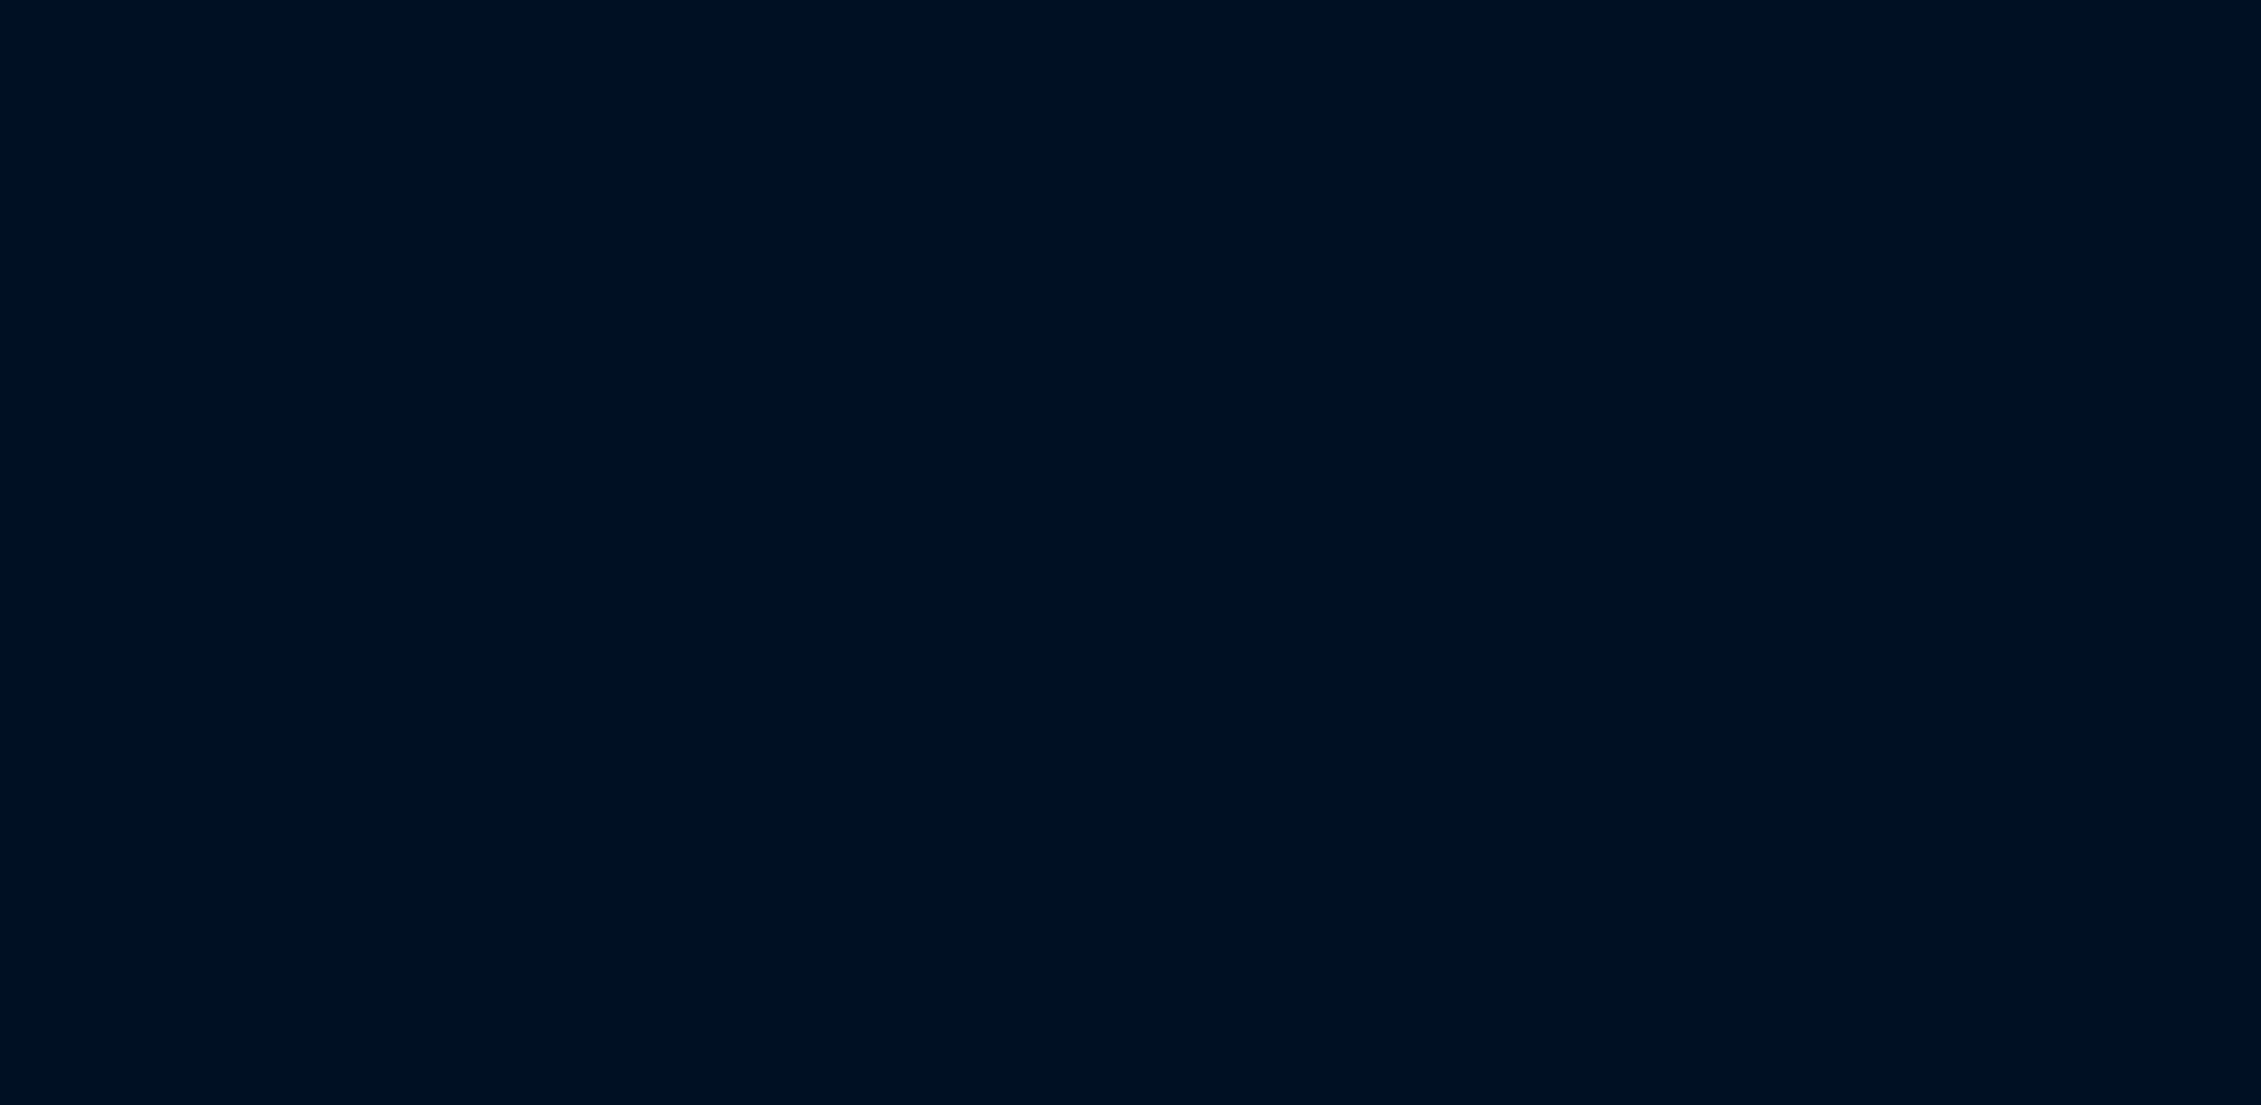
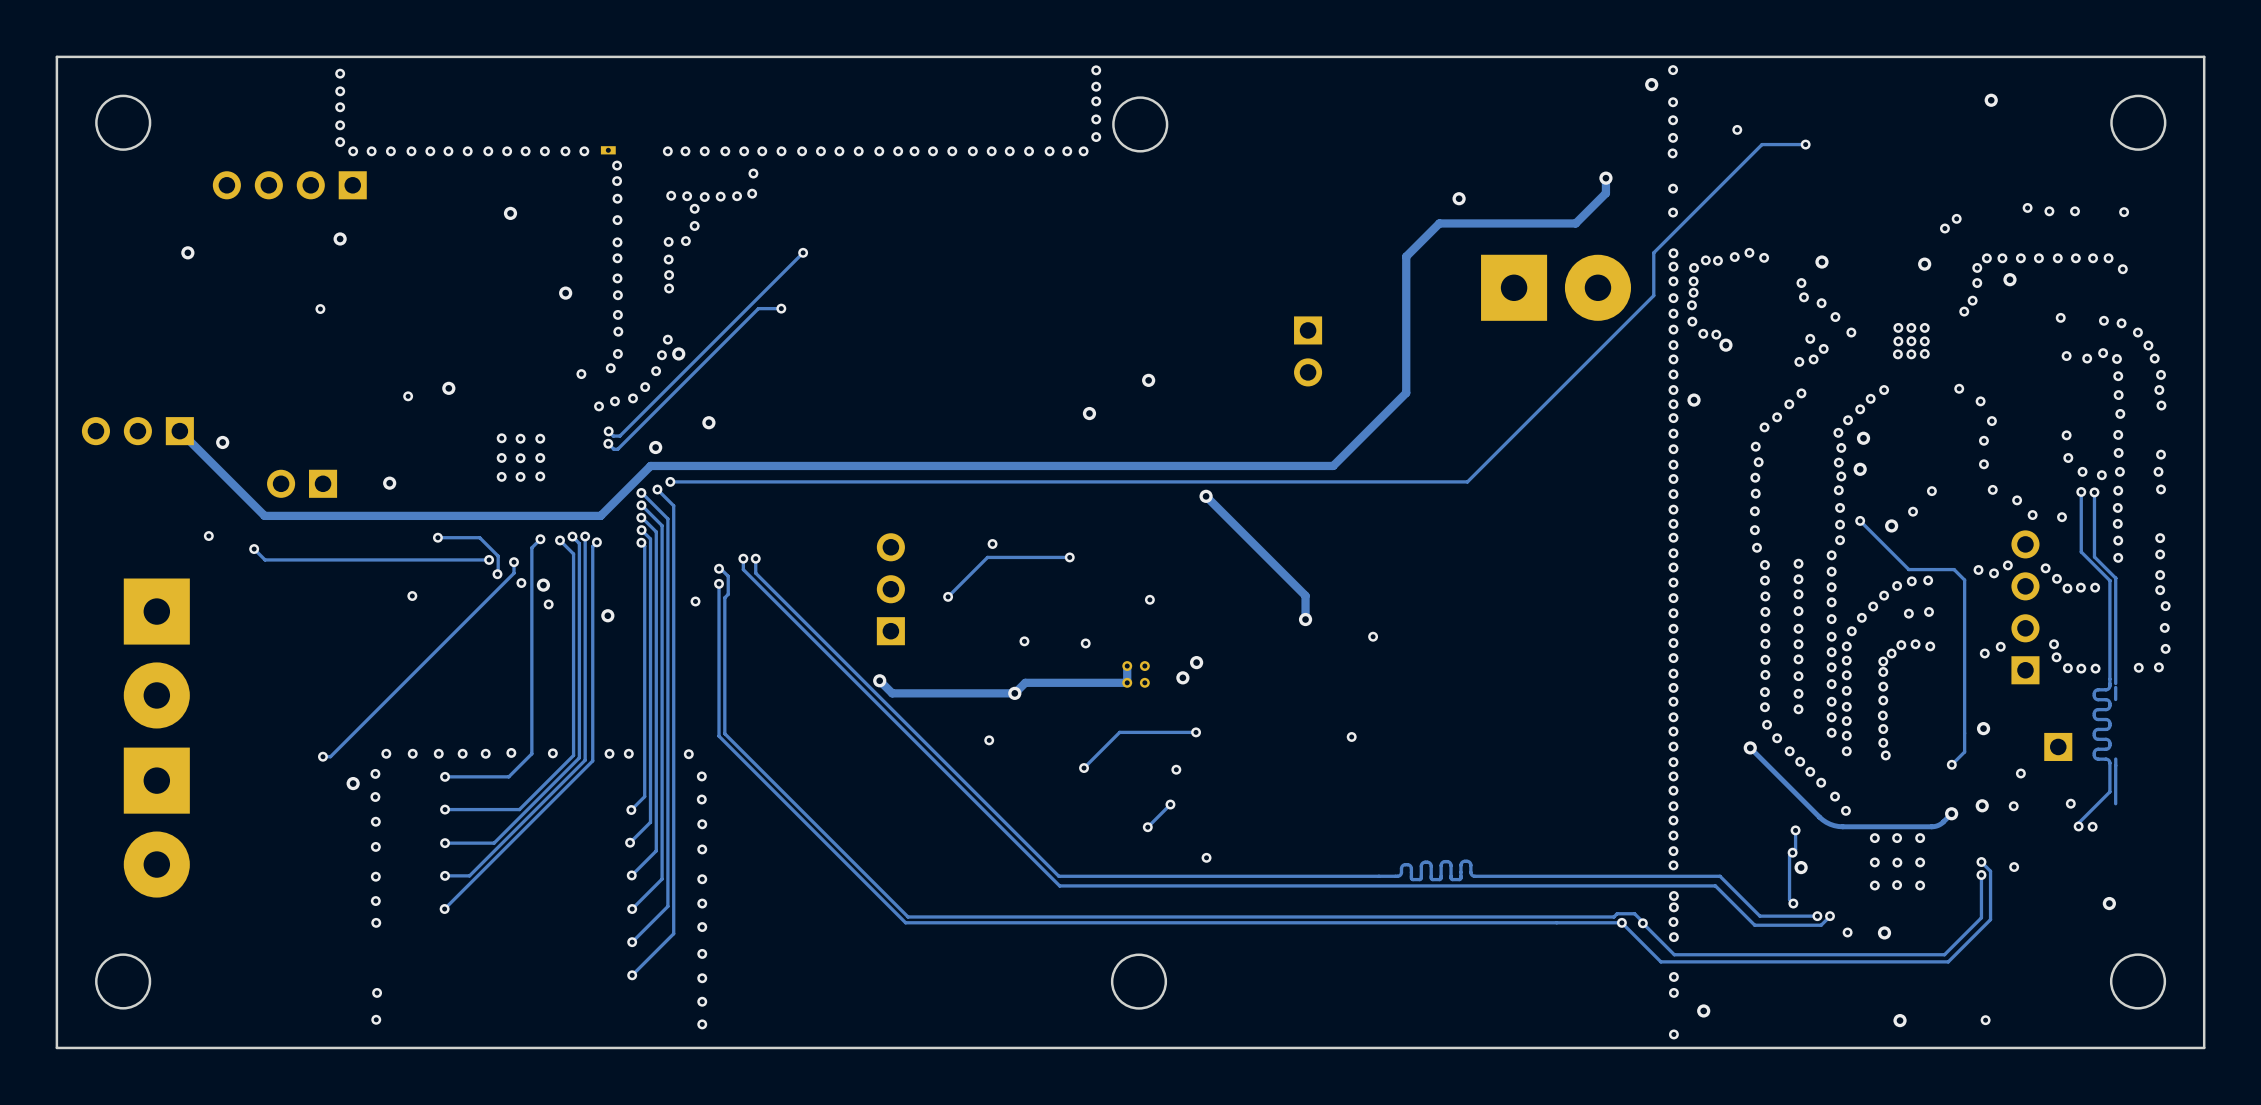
board edge: none -> (2204, 56) (56, 56) (56, 1047) (2204, 1047) (2204, 56)
via: none -> (1096, 70)
via: none -> (1673, 70)
via: none -> (340, 73)
via: none -> (1651, 84)
via: none -> (1096, 86)
via: none -> (340, 91)
round board edge: none -> [95, 94, 152, 151]
round board edge: none -> [2110, 94, 2167, 151]
round board edge: none -> [1112, 96, 1169, 153]
via: none -> (1991, 100)
via: none -> (1096, 101)
via: none -> (1673, 102)
via: none -> (340, 107)
via: none -> (1096, 119)
via: none -> (1673, 120)
via: none -> (340, 125)
via: none -> (1737, 129)
via: none -> (1096, 137)
via: none -> (1673, 137)
via: none -> (340, 142)
track: none -> (1805, 144) (1762, 144) (1653, 252) (1653, 295) (1467, 481) (670, 481)
via: none -> (1805, 144)
part: none -> (608, 150)
via: none -> (353, 151)
via: none -> (371, 151)
via: none -> (390, 151)
via: none -> (411, 151)
via: none -> (430, 151)
via: none -> (448, 151)
via: none -> (467, 151)
via: none -> (488, 151)
via: none -> (507, 151)
via: none -> (525, 151)
via: none -> (544, 151)
via: none -> (565, 151)
via: none -> (584, 151)
via: none -> (667, 151)
via: none -> (685, 151)
via: none -> (704, 151)
via: none -> (725, 151)
via: none -> (744, 151)
via: none -> (762, 151)
via: none -> (781, 151)
via: none -> (802, 151)
via: none -> (820, 151)
via: none -> (839, 151)
via: none -> (858, 151)
via: none -> (879, 151)
via: none -> (898, 151)
via: none -> (914, 151)
via: none -> (932, 151)
via: none -> (952, 151)
via: none -> (972, 151)
via: none -> (991, 151)
via: none -> (1009, 151)
via: none -> (1029, 151)
via: none -> (1049, 151)
via: none -> (1067, 151)
via: none -> (1083, 151)
via: none -> (1672, 153)
via: none -> (617, 165)
via: none -> (753, 173)
track: none -> (1605, 178) (1605, 193) (1575, 223) (1439, 223) (1406, 256) (1406, 392) (1333, 465) (650, 465) (600, 515) (264, 515) (179, 431)
via: none -> (1605, 178)
via: none -> (617, 181)
part: none -> (289, 185)
via: none -> (1673, 188)
via: none -> (752, 193)
via: none -> (671, 195)
via: none -> (687, 196)
via: none -> (720, 196)
via: none -> (737, 196)
via: none -> (704, 197)
via: none -> (617, 198)
via: none -> (1459, 198)
via: none -> (2027, 207)
via: none -> (694, 208)
via: none -> (2049, 211)
via: none -> (2075, 211)
via: none -> (1673, 212)
via: none -> (2124, 212)
via: none -> (510, 213)
via: none -> (1956, 218)
via: none -> (617, 220)
via: none -> (694, 225)
via: none -> (1944, 228)
via: none -> (340, 238)
via: none -> (668, 241)
via: none -> (685, 241)
via: none -> (617, 242)
via: none -> (187, 252)
track: none -> (803, 252) (619, 436) (613, 436) (608, 431)
via: none -> (803, 252)
via: none -> (1749, 252)
via: none -> (1673, 253)
via: none -> (1734, 257)
via: none -> (1764, 257)
via: none -> (617, 258)
via: none -> (1986, 258)
via: none -> (2002, 258)
via: none -> (2020, 258)
via: none -> (2038, 258)
via: none -> (2057, 258)
via: none -> (2075, 258)
via: none -> (2093, 258)
via: none -> (2108, 258)
via: none -> (668, 259)
via: none -> (1705, 260)
via: none -> (1717, 260)
via: none -> (1821, 262)
via: none -> (1924, 264)
via: none -> (1673, 266)
via: none -> (1694, 267)
via: none -> (1977, 267)
via: none -> (2122, 269)
via: none -> (669, 275)
via: none -> (617, 278)
via: none -> (2009, 279)
via: none -> (1673, 281)
via: none -> (1693, 281)
via: none -> (1801, 283)
via: none -> (1977, 283)
part: none -> (1556, 287)
via: none -> (669, 288)
via: none -> (1693, 292)
via: none -> (565, 293)
via: none -> (617, 295)
via: none -> (1803, 297)
via: none -> (1673, 298)
via: none -> (1972, 300)
via: none -> (1821, 303)
via: none -> (1691, 305)
track: none -> (781, 308) (758, 308) (617, 449) (613, 449) (608, 443)
via: none -> (781, 308)
via: none -> (320, 309)
via: none -> (1964, 311)
via: none -> (1673, 313)
via: none -> (617, 314)
via: none -> (1835, 317)
via: none -> (2060, 317)
via: none -> (2103, 320)
via: none -> (1692, 321)
via: none -> (2121, 323)
via: none -> (1898, 327)
via: none -> (1911, 327)
via: none -> (1924, 327)
via: none -> (1673, 329)
via: none -> (618, 331)
via: none -> (1851, 332)
via: none -> (2137, 332)
via: none -> (1703, 333)
via: none -> (1716, 334)
via: none -> (1810, 338)
via: none -> (667, 339)
via: none -> (1898, 341)
via: none -> (1911, 341)
via: none -> (1924, 341)
via: none -> (1673, 345)
via: none -> (1725, 345)
via: none -> (2148, 345)
via: none -> (1823, 348)
part: none -> (1308, 351)
via: none -> (617, 353)
via: none -> (678, 353)
via: none -> (1924, 353)
via: none -> (2103, 353)
via: none -> (1897, 354)
via: none -> (1911, 354)
via: none -> (661, 355)
via: none -> (2066, 356)
via: none -> (2087, 358)
via: none -> (2116, 358)
via: none -> (2154, 358)
via: none -> (1673, 359)
via: none -> (1813, 359)
via: none -> (1799, 361)
via: none -> (610, 368)
via: none -> (656, 371)
via: none -> (581, 374)
via: none -> (1673, 374)
via: none -> (2161, 374)
via: none -> (2118, 376)
via: none -> (1148, 380)
via: none -> (645, 387)
via: none -> (448, 388)
via: none -> (1959, 388)
via: none -> (1673, 390)
via: none -> (1884, 390)
via: none -> (2159, 390)
via: none -> (1801, 393)
via: none -> (2118, 395)
via: none -> (408, 396)
via: none -> (633, 398)
via: none -> (1870, 398)
via: none -> (1694, 400)
via: none -> (614, 401)
via: none -> (1980, 401)
via: none -> (1673, 404)
via: none -> (1789, 404)
via: none -> (2161, 405)
via: none -> (599, 406)
via: none -> (1860, 409)
via: none -> (1089, 413)
via: none -> (2120, 413)
via: none -> (1777, 417)
via: none -> (1673, 418)
via: none -> (1848, 420)
via: none -> (1991, 421)
via: none -> (708, 422)
via: none -> (1764, 427)
part: none -> (137, 431)
via: none -> (608, 431)
via: none -> (1838, 432)
via: none -> (1673, 433)
via: none -> (2118, 434)
via: none -> (2066, 435)
via: none -> (501, 438)
via: none -> (520, 438)
via: none -> (540, 438)
via: none -> (1863, 438)
via: none -> (1983, 440)
via: none -> (222, 442)
via: none -> (608, 443)
via: none -> (1755, 446)
via: none -> (655, 447)
via: none -> (1841, 447)
via: none -> (1673, 449)
via: none -> (2118, 452)
via: none -> (2161, 454)
via: none -> (501, 457)
via: none -> (540, 457)
via: none -> (2068, 457)
via: none -> (520, 458)
via: none -> (1758, 462)
via: none -> (1838, 462)
via: none -> (1673, 464)
via: none -> (1983, 464)
via: none -> (1860, 469)
via: none -> (2082, 471)
via: none -> (2119, 471)
via: none -> (2158, 471)
via: none -> (2101, 475)
via: none -> (501, 476)
via: none -> (520, 476)
via: none -> (540, 476)
via: none -> (1841, 476)
via: none -> (1755, 477)
via: none -> (1673, 478)
via: none -> (670, 481)
part: none -> (302, 483)
via: none -> (389, 483)
via: none -> (657, 489)
via: none -> (1992, 489)
via: none -> (2161, 489)
via: none -> (1838, 490)
via: none -> (2118, 490)
track: none -> (657, 491) (657, 489) (673, 505) (673, 933) (632, 975)
via: none -> (1931, 491)
track: none -> (2081, 491) (2081, 551) (2109, 580) (2109, 686) (2107, 689) (2096, 690) (2094, 693) (2096, 699) (2107, 699) (2109, 703) (2108, 709) (2096, 709) (2094, 713) (2096, 719) (2106, 719) (2109, 721) (2108, 728) (2096, 729) (2094, 735) (2096, 739) (2108, 740) (2109, 746) (2106, 749) (2096, 749) (2094, 755) (2096, 758) (2106, 759) (2109, 761) (2109, 791) (2078, 823) (2078, 826)
via: none -> (2081, 491)
track: none -> (641, 492) (667, 518) (667, 906) (633, 942)
via: none -> (641, 492)
track: none -> (2094, 492) (2094, 556) (2115, 578) (2115, 683)
via: none -> (2094, 492)
via: none -> (1755, 493)
via: none -> (1673, 494)
track: none -> (1206, 496) (1305, 595) (1305, 619)
via: none -> (1206, 496)
via: none -> (2017, 500)
track: none -> (641, 505) (662, 525) (662, 879) (632, 909)
via: none -> (641, 505)
via: none -> (1840, 507)
via: none -> (2117, 507)
via: none -> (1673, 509)
via: none -> (1754, 511)
via: none -> (1913, 511)
via: none -> (2032, 515)
track: none -> (641, 517) (656, 531) (656, 850) (631, 875)
via: none -> (641, 517)
via: none -> (2062, 517)
track: none -> (1860, 520) (1908, 569) (1954, 569) (1964, 580) (1964, 751) (1951, 764)
via: none -> (1860, 520)
via: none -> (1673, 523)
via: none -> (2117, 523)
via: none -> (1840, 524)
via: none -> (1891, 525)
track: none -> (641, 530) (650, 538) (650, 822) (630, 842)
via: none -> (641, 530)
via: none -> (1754, 530)
via: none -> (208, 536)
track: none -> (572, 536) (579, 543) (579, 757) (494, 843) (445, 843)
via: none -> (572, 536)
track: none -> (585, 536) (585, 760) (469, 875) (445, 875)
via: none -> (585, 536)
track: none -> (437, 537) (479, 537) (498, 556) (497, 574)
via: none -> (437, 537)
via: none -> (1673, 537)
via: none -> (2160, 538)
track: none -> (540, 539) (531, 547) (531, 753) (508, 776) (445, 776)
via: none -> (540, 539)
track: none -> (560, 540) (573, 554) (573, 755) (519, 809) (445, 809)
via: none -> (560, 540)
via: none -> (1840, 540)
via: none -> (2118, 540)
track: none -> (596, 542) (592, 546) (592, 760) (444, 909)
via: none -> (596, 542)
track: none -> (641, 542) (644, 546) (644, 796) (631, 809)
via: none -> (641, 542)
via: none -> (992, 544)
via: none -> (1756, 547)
track: none -> (254, 549) (265, 559) (489, 559)
via: none -> (254, 549)
via: none -> (1673, 553)
via: none -> (2160, 554)
via: none -> (1831, 555)
track: none -> (1069, 557) (987, 557) (948, 596)
via: none -> (1069, 557)
via: none -> (2118, 557)
track: none -> (743, 558) (743, 569) (1059, 885) (1715, 885) (1754, 925) (1821, 925) (1829, 916)
via: none -> (743, 558)
track: none -> (755, 558) (755, 573) (1058, 876) (1397, 876) (1401, 874) (1402, 866) (1407, 864) (1411, 867) (1411, 878) (1419, 879) (1421, 864) (1427, 862) (1431, 865) (1431, 878) (1439, 879) (1441, 863) (1447, 861) (1450, 864) (1451, 878) (1459, 879) (1461, 863) (1466, 861) (1470, 863) (1471, 873) (1474, 876) (1720, 876) (1759, 916) (1817, 916)
via: none -> (755, 558)
via: none -> (489, 559)
track: none -> (514, 562) (514, 573) (330, 756) (322, 756)
via: none -> (514, 562)
via: none -> (1798, 563)
via: none -> (1764, 564)
via: none -> (2007, 565)
via: none -> (1673, 567)
track: none -> (719, 568) (728, 576) (728, 594) (724, 597) (724, 733) (908, 916) (1613, 916) (1617, 913) (1634, 913) (1674, 954) (1944, 954) (1981, 917) (1981, 875)
via: none -> (719, 568)
via: none -> (2045, 568)
via: none -> (1978, 570)
via: none -> (1831, 571)
via: none -> (1994, 573)
via: none -> (497, 574)
via: none -> (2160, 575)
via: none -> (2056, 578)
via: none -> (1798, 579)
via: none -> (1764, 580)
via: none -> (1928, 580)
via: none -> (1911, 581)
via: none -> (1673, 582)
via: none -> (521, 583)
track: none -> (719, 583) (719, 736) (905, 922) (1621, 922) (1660, 961) (1948, 961) (1990, 919) (1990, 871) (1981, 862)
via: none -> (719, 583)
via: none -> (543, 585)
via: none -> (1897, 585)
via: none -> (1831, 587)
via: none -> (2080, 587)
via: none -> (2095, 587)
via: none -> (2067, 588)
part: none -> (890, 589)
via: none -> (2160, 590)
via: none -> (1798, 594)
via: none -> (1884, 595)
via: none -> (412, 596)
via: none -> (948, 596)
via: none -> (1765, 596)
via: none -> (1673, 598)
via: none -> (1149, 599)
via: none -> (695, 601)
via: none -> (1831, 602)
via: none -> (548, 604)
via: none -> (1873, 606)
via: none -> (2165, 606)
part: none -> (2025, 607)
via: none -> (1765, 611)
via: none -> (1798, 611)
via: none -> (1929, 611)
via: none -> (1673, 613)
via: none -> (1908, 613)
via: none -> (607, 615)
via: none -> (1861, 617)
via: none -> (1305, 619)
via: none -> (1831, 619)
via: none -> (2164, 627)
via: none -> (1673, 628)
via: none -> (1765, 628)
via: none -> (1798, 628)
via: none -> (1851, 631)
via: none -> (1373, 636)
via: none -> (1831, 636)
via: none -> (1024, 641)
via: none -> (1085, 643)
via: none -> (1673, 643)
via: none -> (1765, 643)
via: none -> (1798, 644)
via: none -> (1915, 644)
via: none -> (2054, 644)
via: none -> (1901, 645)
via: none -> (1846, 646)
via: none -> (1930, 646)
via: none -> (2000, 646)
via: none -> (2165, 648)
via: none -> (1831, 652)
part: none -> (156, 653)
via: none -> (1891, 653)
via: none -> (1984, 653)
via: none -> (2056, 657)
via: none -> (1673, 658)
via: none -> (1765, 659)
via: none -> (1798, 659)
via: none -> (1846, 660)
via: none -> (1883, 661)
via: none -> (1196, 662)
track: none -> (1127, 666) (1127, 682) (1025, 682) (1014, 693) (892, 693) (879, 680)
via: none -> (1831, 667)
via: none -> (2138, 667)
via: none -> (2158, 667)
via: none -> (2067, 668)
via: none -> (2081, 668)
via: none -> (2095, 668)
via: none -> (1883, 671)
via: none -> (1673, 673)
part: none -> (1136, 674)
via: none -> (1765, 674)
via: none -> (1846, 675)
via: none -> (1798, 676)
via: none -> (1182, 677)
via: none -> (879, 680)
via: none -> (1831, 684)
via: none -> (1883, 686)
via: none -> (1673, 687)
track: none -> (2115, 687) (2115, 699)
via: none -> (1846, 690)
via: none -> (1764, 692)
via: none -> (1014, 693)
via: none -> (1798, 693)
via: none -> (1883, 700)
via: none -> (1673, 701)
via: none -> (1831, 701)
via: none -> (1846, 706)
via: none -> (1764, 707)
via: none -> (1798, 709)
via: none -> (1882, 715)
via: none -> (1673, 717)
via: none -> (1831, 717)
via: none -> (1846, 721)
via: none -> (1767, 724)
via: none -> (1983, 728)
via: none -> (1883, 729)
via: none -> (1673, 731)
track: none -> (1196, 732) (1119, 732) (1084, 768)
via: none -> (1196, 732)
via: none -> (1831, 732)
via: none -> (1846, 735)
via: none -> (1351, 736)
via: none -> (1777, 738)
via: none -> (989, 740)
via: none -> (1883, 742)
via: none -> (1673, 746)
part: none -> (2058, 746)
track: none -> (1750, 747) (1819, 817) (1834, 825) (1933, 826) (1940, 823) (1951, 813)
via: none -> (1750, 747)
via: none -> (1789, 751)
via: none -> (1846, 751)
via: none -> (511, 752)
via: none -> (386, 753)
via: none -> (412, 753)
via: none -> (438, 753)
via: none -> (462, 753)
via: none -> (485, 753)
via: none -> (552, 753)
via: none -> (609, 753)
via: none -> (628, 753)
via: none -> (688, 754)
via: none -> (1885, 755)
via: none -> (322, 756)
track: none -> (2115, 759) (2115, 765)
via: none -> (1800, 761)
via: none -> (1673, 762)
via: none -> (1951, 764)
track: none -> (2115, 765) (2115, 803)
via: none -> (1084, 768)
via: none -> (1176, 769)
via: none -> (1810, 771)
via: none -> (375, 773)
via: none -> (2020, 773)
via: none -> (445, 776)
via: none -> (701, 776)
via: none -> (1673, 776)
via: none -> (1821, 782)
via: none -> (353, 783)
via: none -> (1673, 790)
via: none -> (375, 796)
via: none -> (1835, 796)
via: none -> (701, 799)
via: none -> (2070, 803)
track: none -> (1170, 804) (1147, 827)
via: none -> (1170, 804)
via: none -> (1982, 805)
via: none -> (1673, 806)
via: none -> (2013, 806)
via: none -> (445, 809)
via: none -> (631, 809)
via: none -> (1845, 810)
via: none -> (1951, 813)
via: none -> (1673, 820)
via: none -> (375, 821)
part: none -> (156, 822)
via: none -> (702, 824)
via: none -> (2078, 826)
via: none -> (2092, 826)
via: none -> (1147, 827)
track: none -> (1795, 830) (1795, 849) (1792, 852)
via: none -> (1795, 830)
via: none -> (1673, 835)
via: none -> (1874, 838)
via: none -> (1897, 838)
via: none -> (1920, 838)
via: none -> (630, 842)
via: none -> (445, 843)
via: none -> (375, 846)
via: none -> (702, 849)
via: none -> (1673, 851)
track: none -> (1792, 852) (1789, 855) (1789, 899) (1793, 903)
via: none -> (1792, 852)
via: none -> (1206, 857)
via: none -> (1874, 862)
via: none -> (1897, 862)
via: none -> (1920, 862)
via: none -> (1981, 862)
via: none -> (1673, 865)
via: none -> (1801, 867)
via: none -> (2014, 867)
via: none -> (445, 875)
via: none -> (631, 875)
via: none -> (1981, 875)
via: none -> (375, 876)
via: none -> (702, 879)
via: none -> (1874, 885)
via: none -> (1897, 885)
via: none -> (1920, 885)
via: none -> (1673, 896)
via: none -> (375, 901)
via: none -> (702, 903)
via: none -> (1793, 903)
via: none -> (2109, 903)
via: none -> (1673, 907)
via: none -> (444, 909)
via: none -> (632, 909)
via: none -> (1817, 916)
via: none -> (1829, 916)
via: none -> (376, 922)
via: none -> (1621, 922)
via: none -> (1673, 922)
via: none -> (1642, 923)
via: none -> (702, 927)
via: none -> (1847, 932)
via: none -> (1884, 932)
via: none -> (1673, 937)
via: none -> (632, 942)
round board edge: none -> [95, 953, 152, 1010]
via: none -> (702, 953)
round board edge: none -> [1110, 953, 1168, 1010]
round board edge: none -> [2109, 953, 2167, 1010]
via: none -> (632, 975)
via: none -> (1673, 976)
via: none -> (702, 978)
via: none -> (377, 992)
via: none -> (1673, 992)
via: none -> (702, 1001)
via: none -> (1703, 1010)
via: none -> (376, 1019)
via: none -> (1900, 1020)
via: none -> (1985, 1020)
via: none -> (702, 1024)
via: none -> (1673, 1034)

